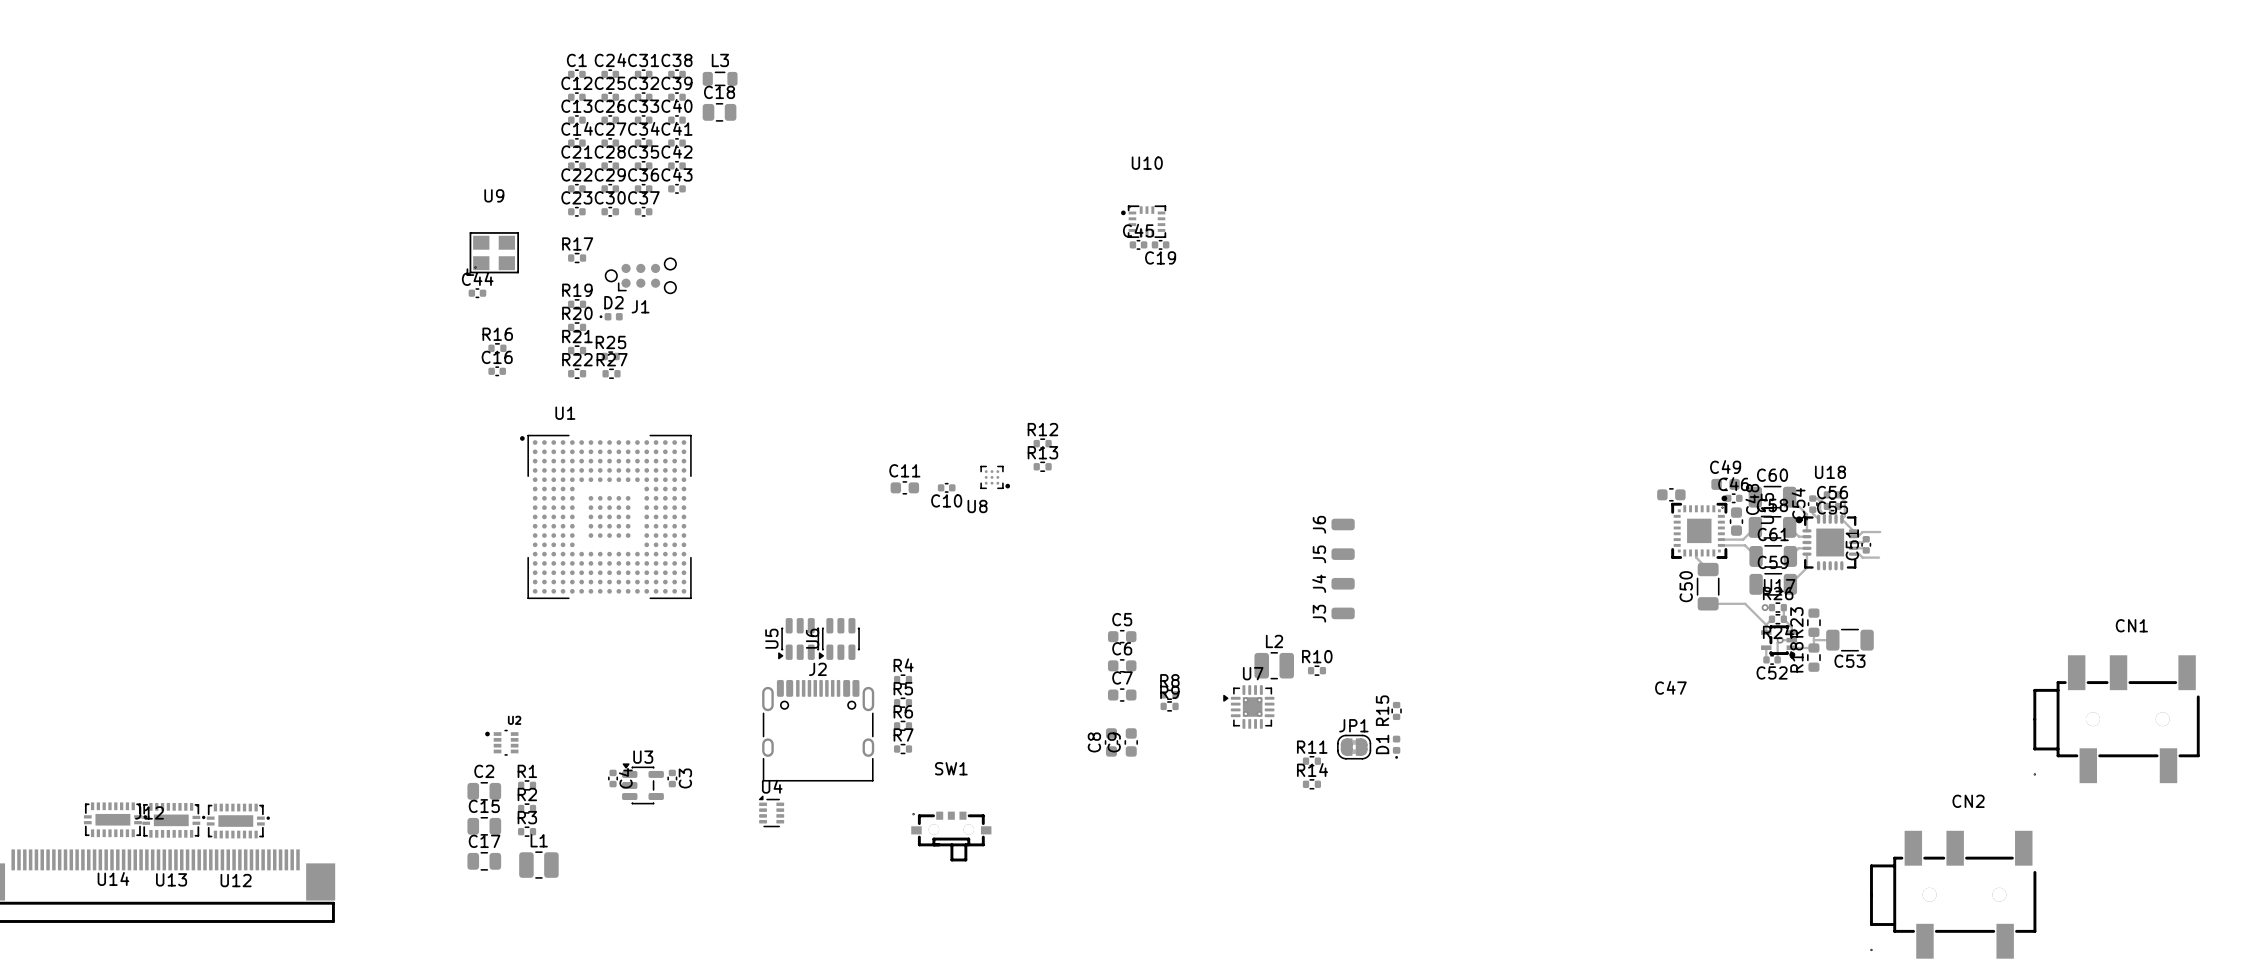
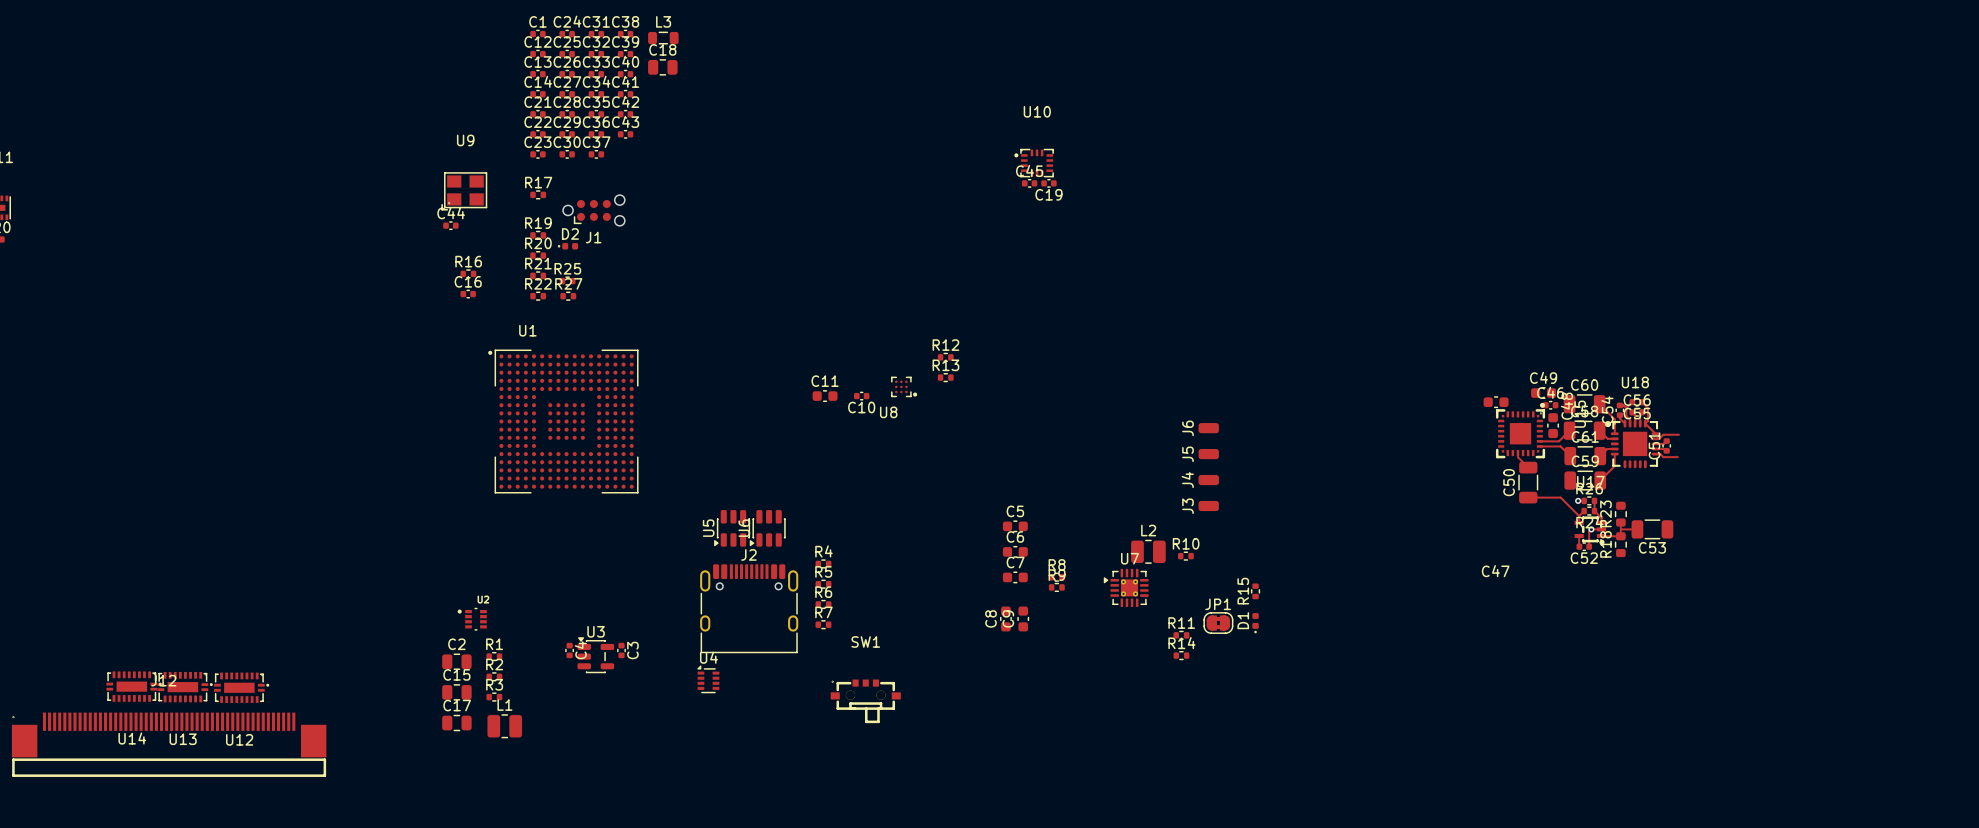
CN1: (2116, 719) -> none
CN2: (1953, 894) -> none

